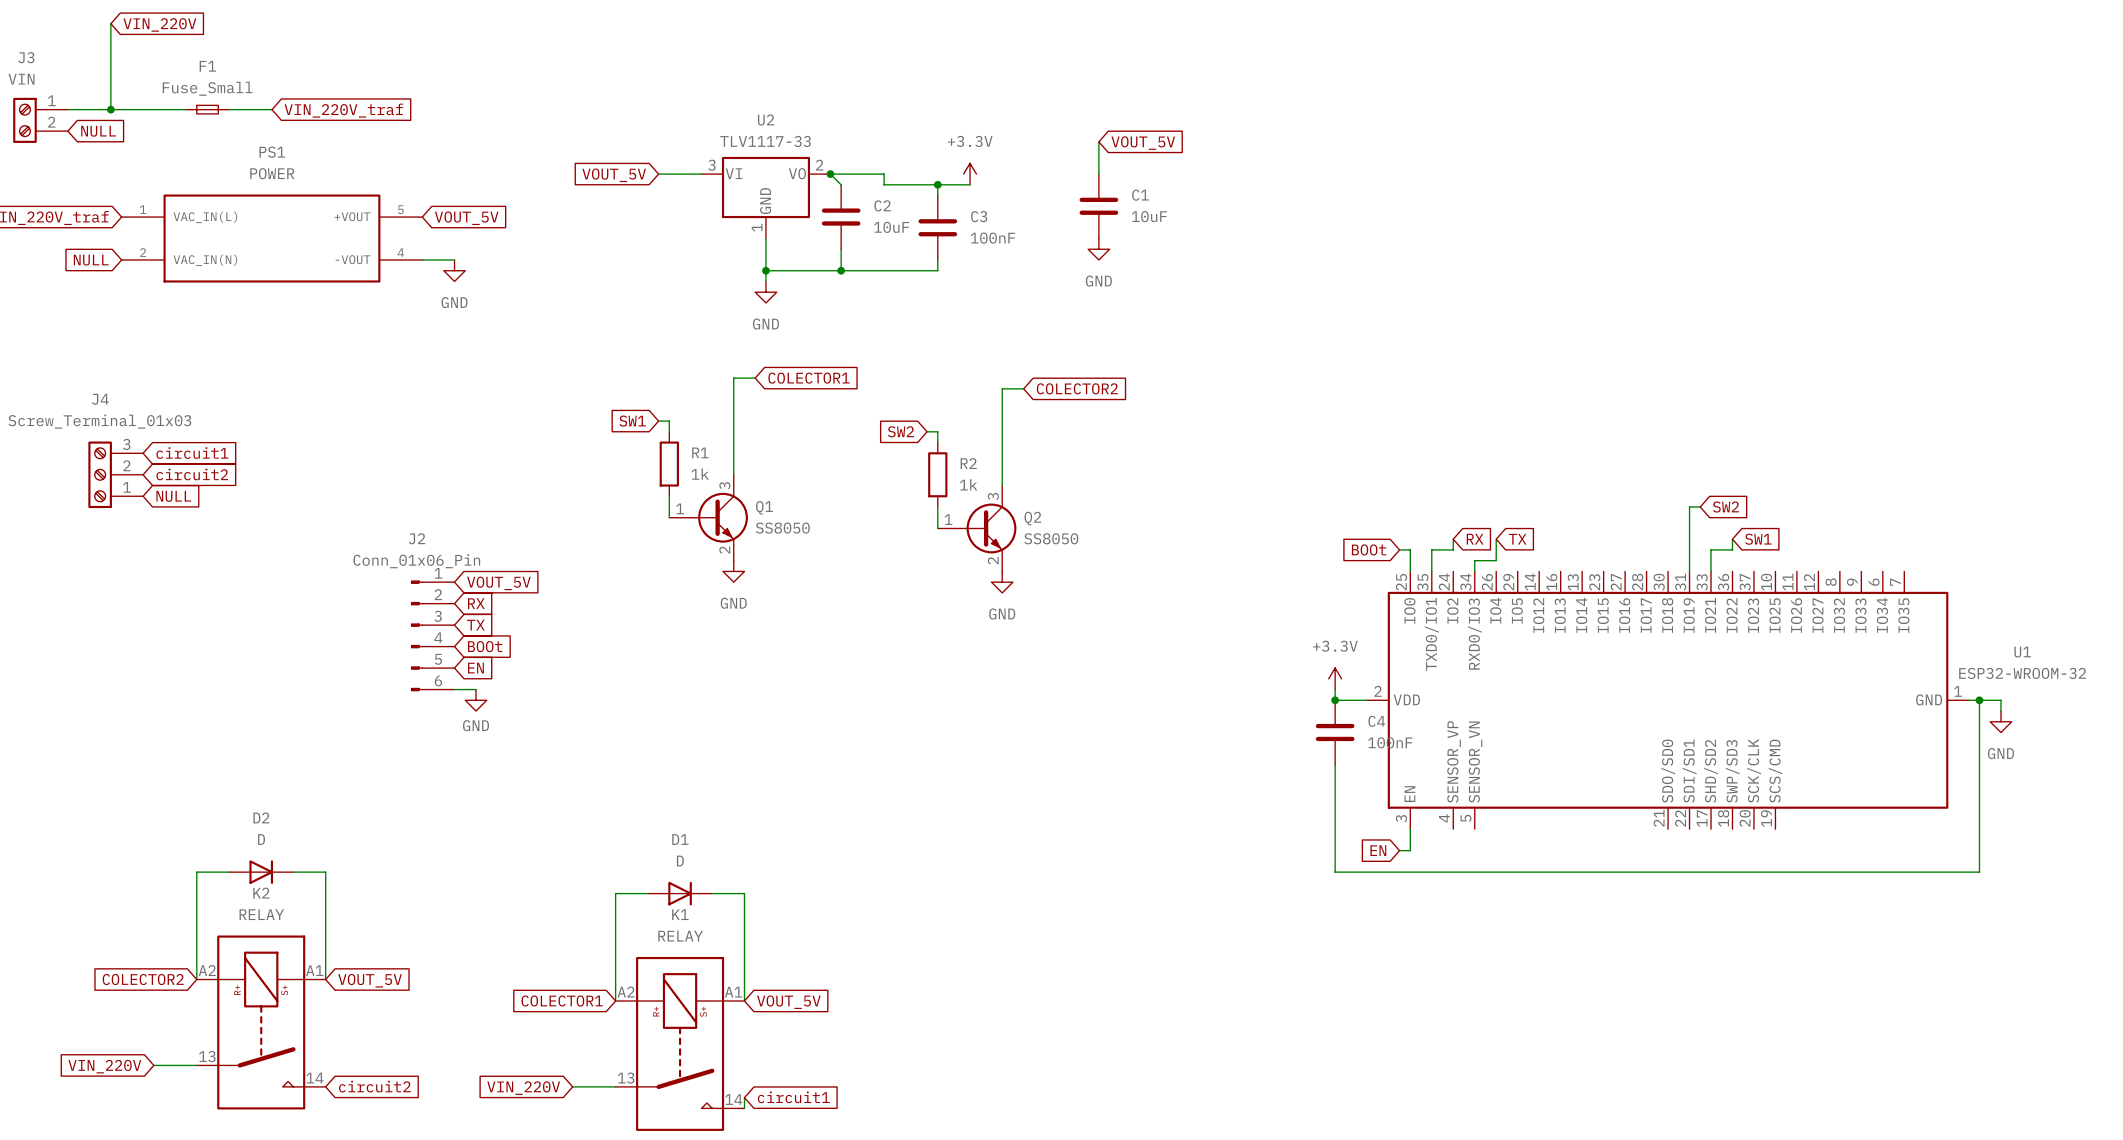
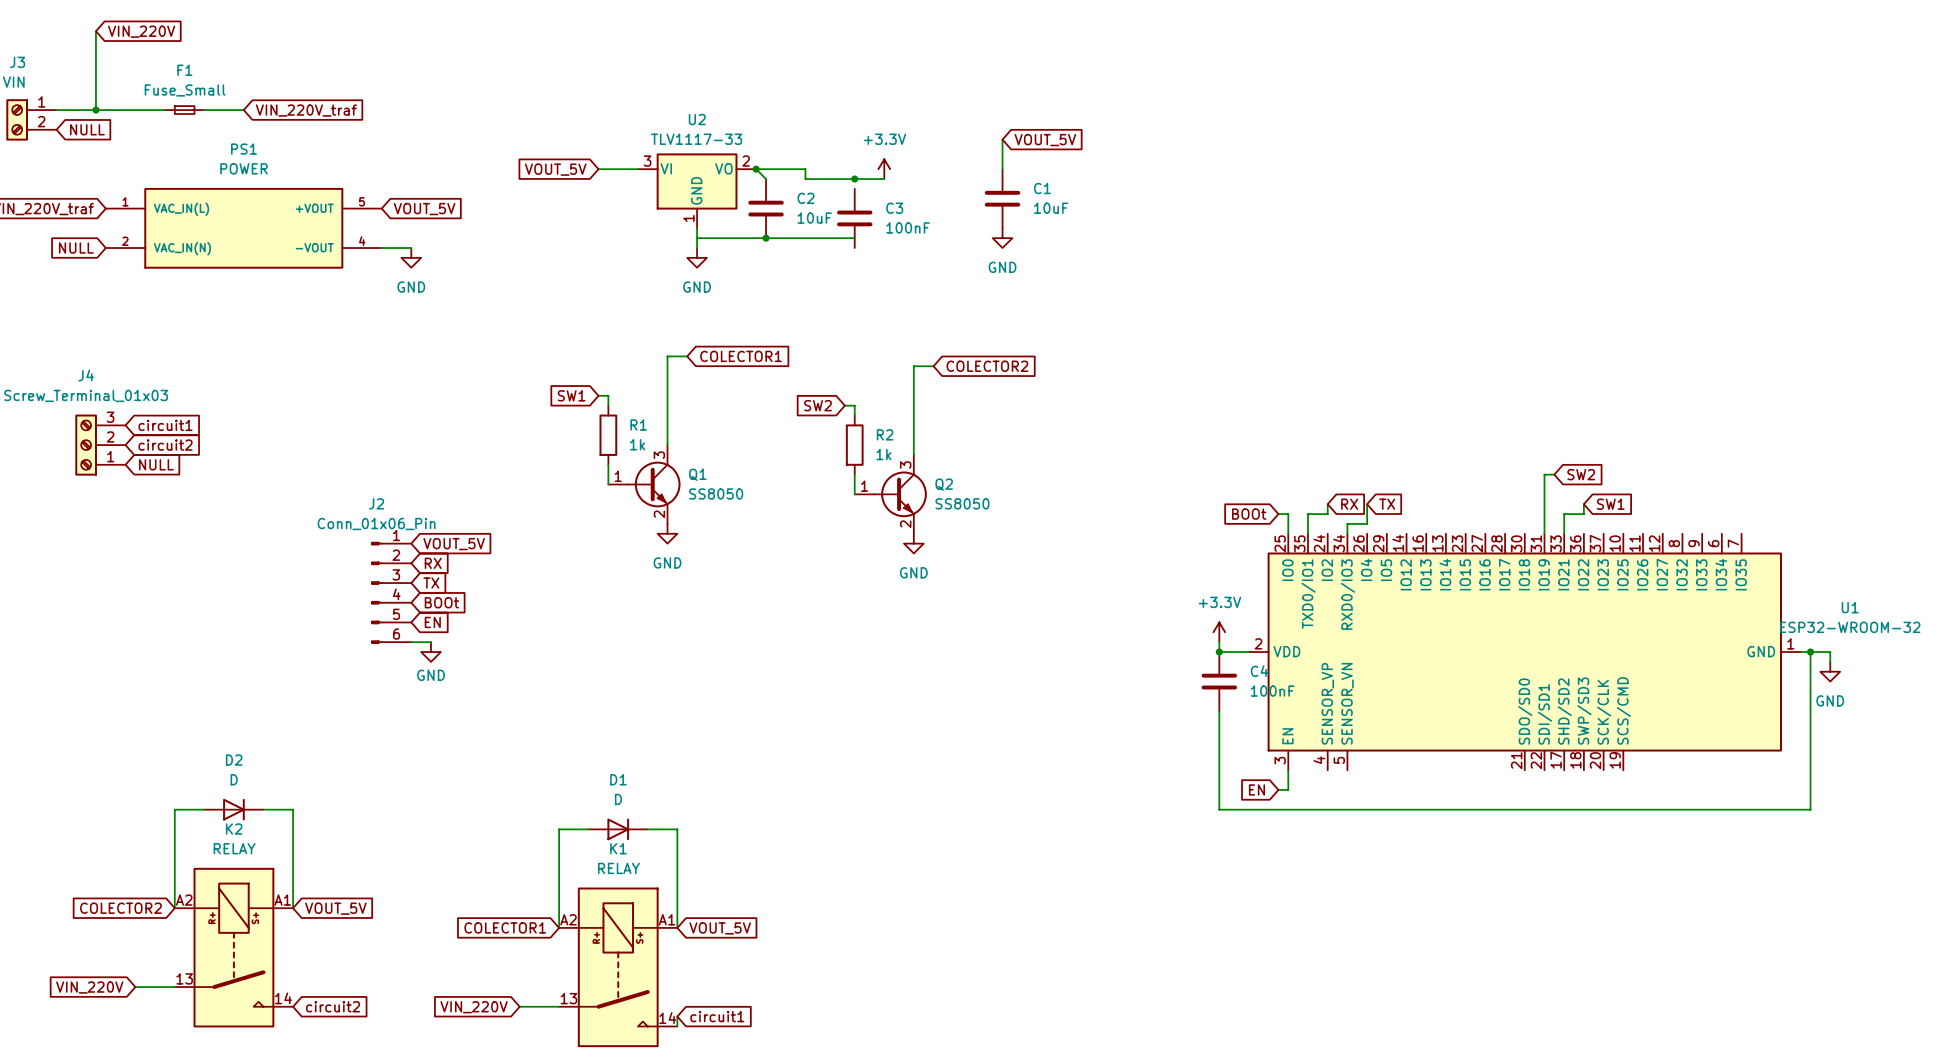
wire: (937, 184) (937, 195) -> none
wire: none -> (697, 238) (854, 238)
wire: (841, 249) (841, 270) -> none
wire: (937, 259) (937, 270) (765, 270) -> none
junction: (765, 270) -> none
junction position: (841, 270) -> (766, 238)
power symbol position: GND (765, 292) -> GND (697, 257)

